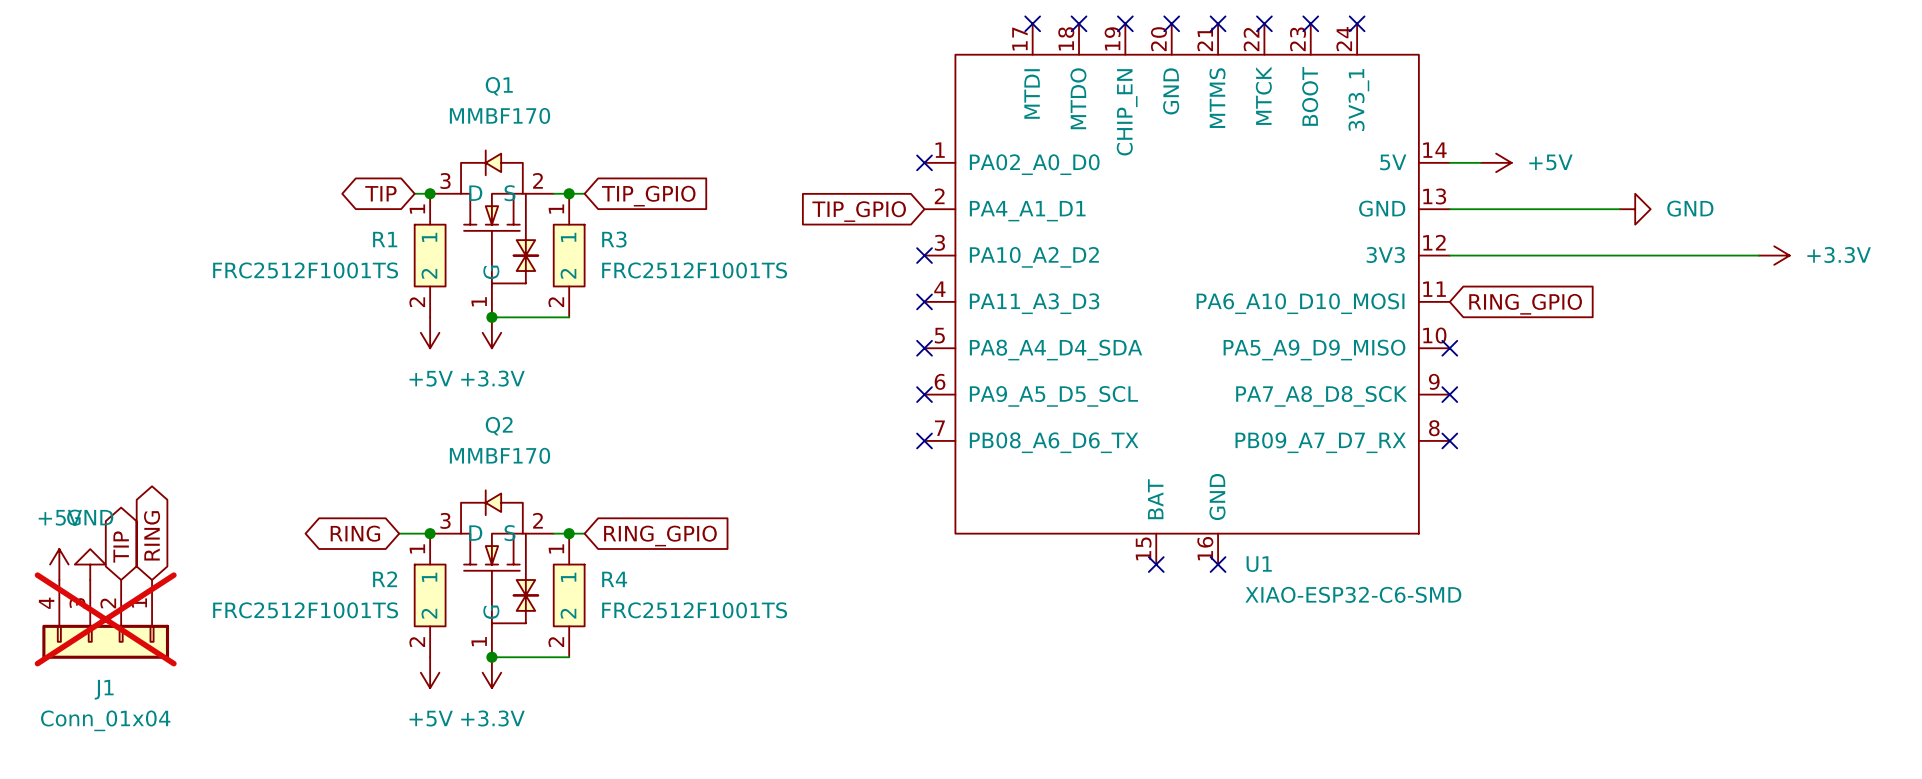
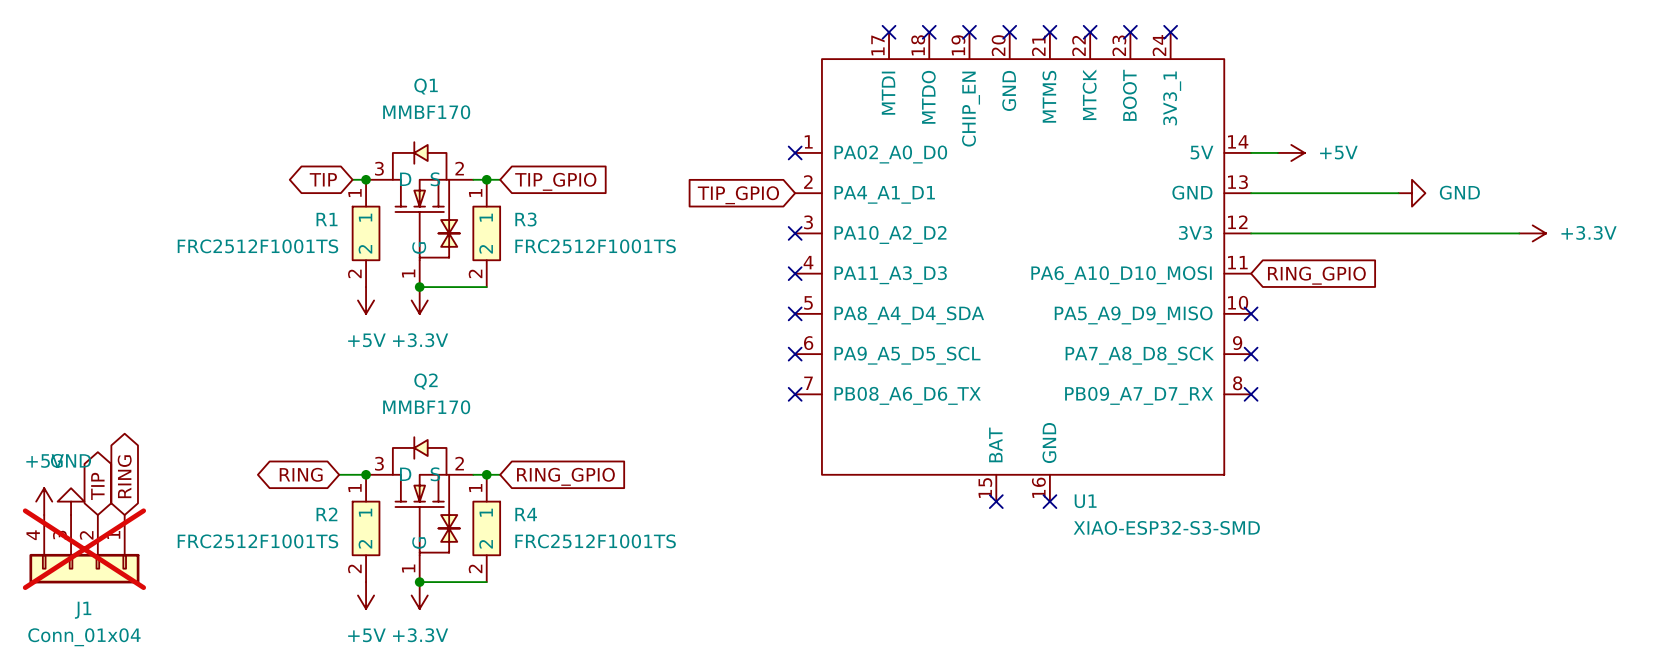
U1 value: XIAO-ESP32-C6-SMD (1353, 594) -> XIAO-ESP32-S3-SMD (1166, 527)

